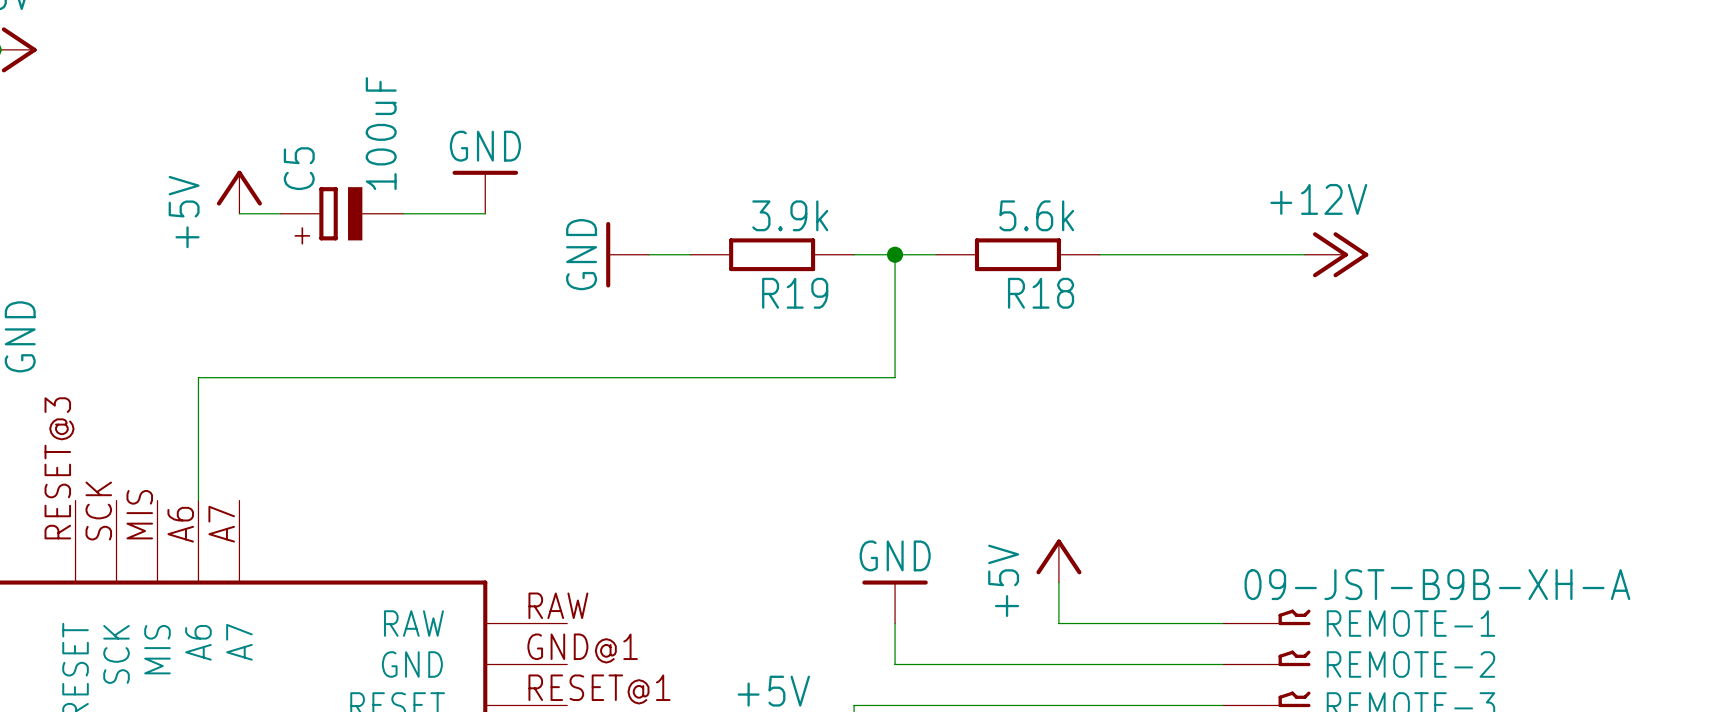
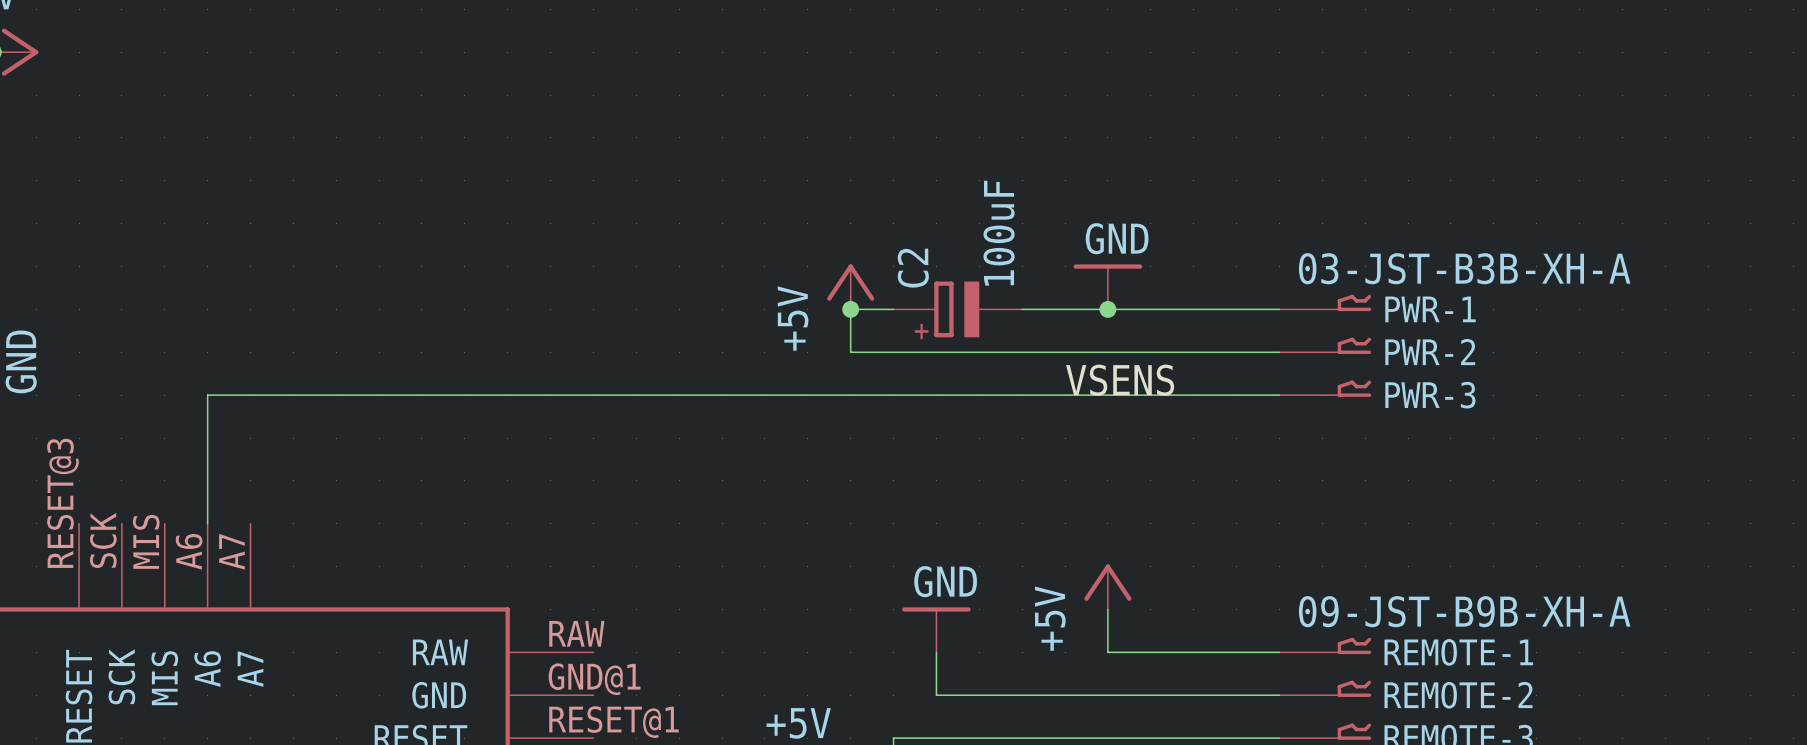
power symbol: +5V (239, 192) -> none
power symbol: GND (485, 192) -> none
wire: (239, 213) (280, 213) -> none
C5: 100uF (341, 213) -> none
wire: (403, 213) (485, 213) -> none
power symbol: GND (627, 254) -> none
wire: (649, 254) (690, 254) -> none
R19: 3.9k (772, 254) -> none
wire: (854, 254) (936, 254) -> none
wire: (895, 254) (895, 377) -> (1279, 395) (936, 395)
junction: (895, 254) -> none
R18: 5.6k (1017, 254) -> none
wire: (1099, 254) (1304, 254) -> none
power symbol: +12V (1336, 254) -> none
power symbol: none -> +5V (850, 286)
power symbol: none -> GND (1107, 286)
PWR-1: none -> 03-JST-B3B-XH-A (1325, 302)
junction: none -> (850, 309)
wire: none -> (893, 309) (850, 309) (850, 352) (1279, 352)
C2: none -> 100uF (957, 309)
wire: none -> (1022, 309) (1279, 309)
junction: none -> (1107, 309)
PWR-2: none -> (1325, 345)
label: none -> VSENS (1120, 380)
PWR-3: none -> (1325, 388)

